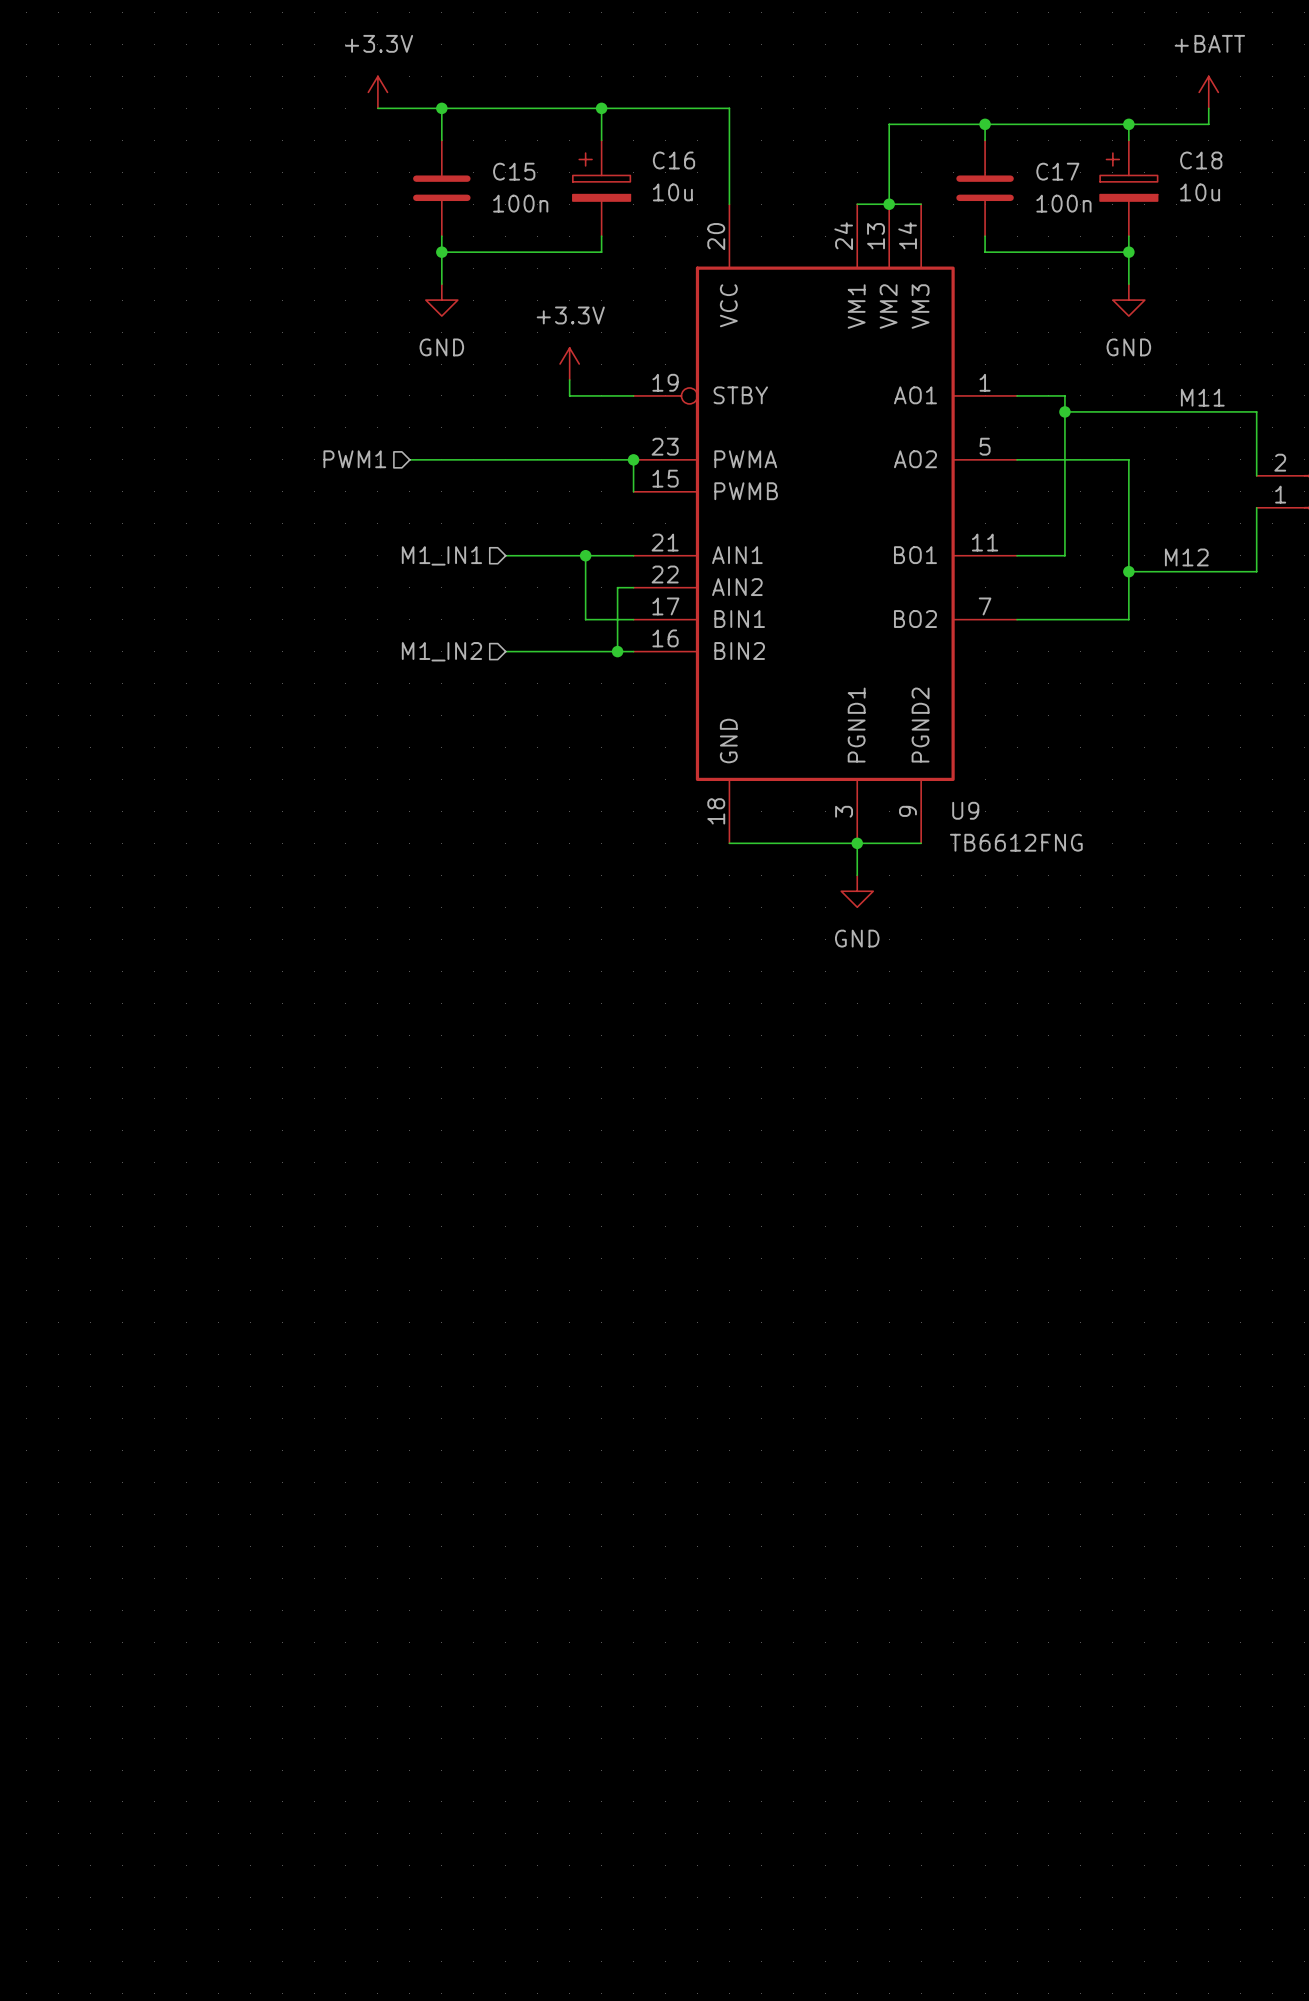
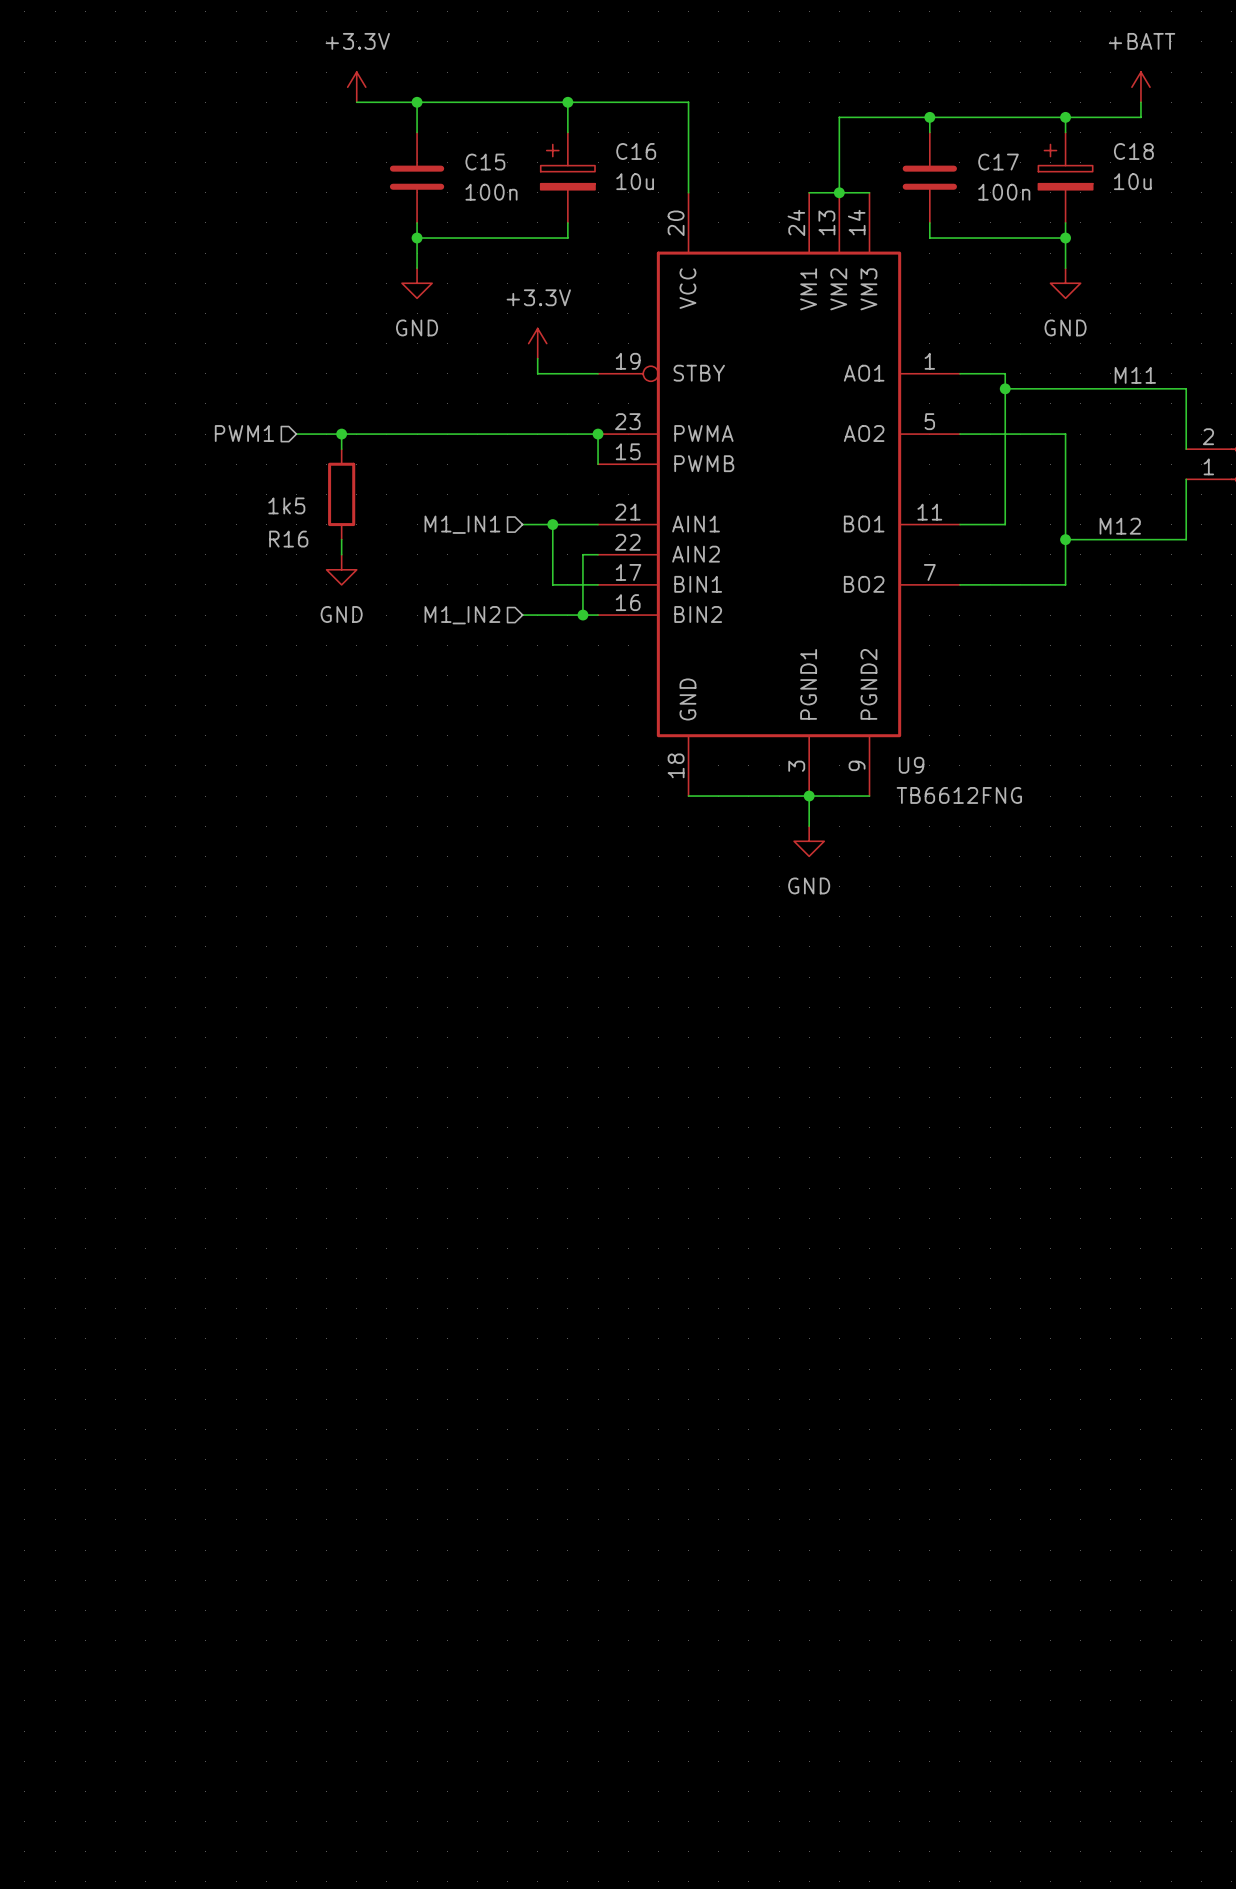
wire: none -> (296, 434) (386, 434)
hierarchical label position: PWM1 (354, 459) -> PWM1 (244, 433)
wire: none -> (341, 434) (341, 449)
junction: none -> (341, 434)
R16: none -> 1k5 (341, 494)
hierarchical label position: M1_IN1 (441, 555) -> M1_IN1 (462, 524)
wire: (505, 555) (553, 555) -> none
wire: none -> (341, 539) (341, 554)
power symbol: none -> GND (341, 569)
hierarchical label position: M1_IN2 (441, 651) -> M1_IN2 (462, 615)
wire: (505, 651) (553, 651) -> none

